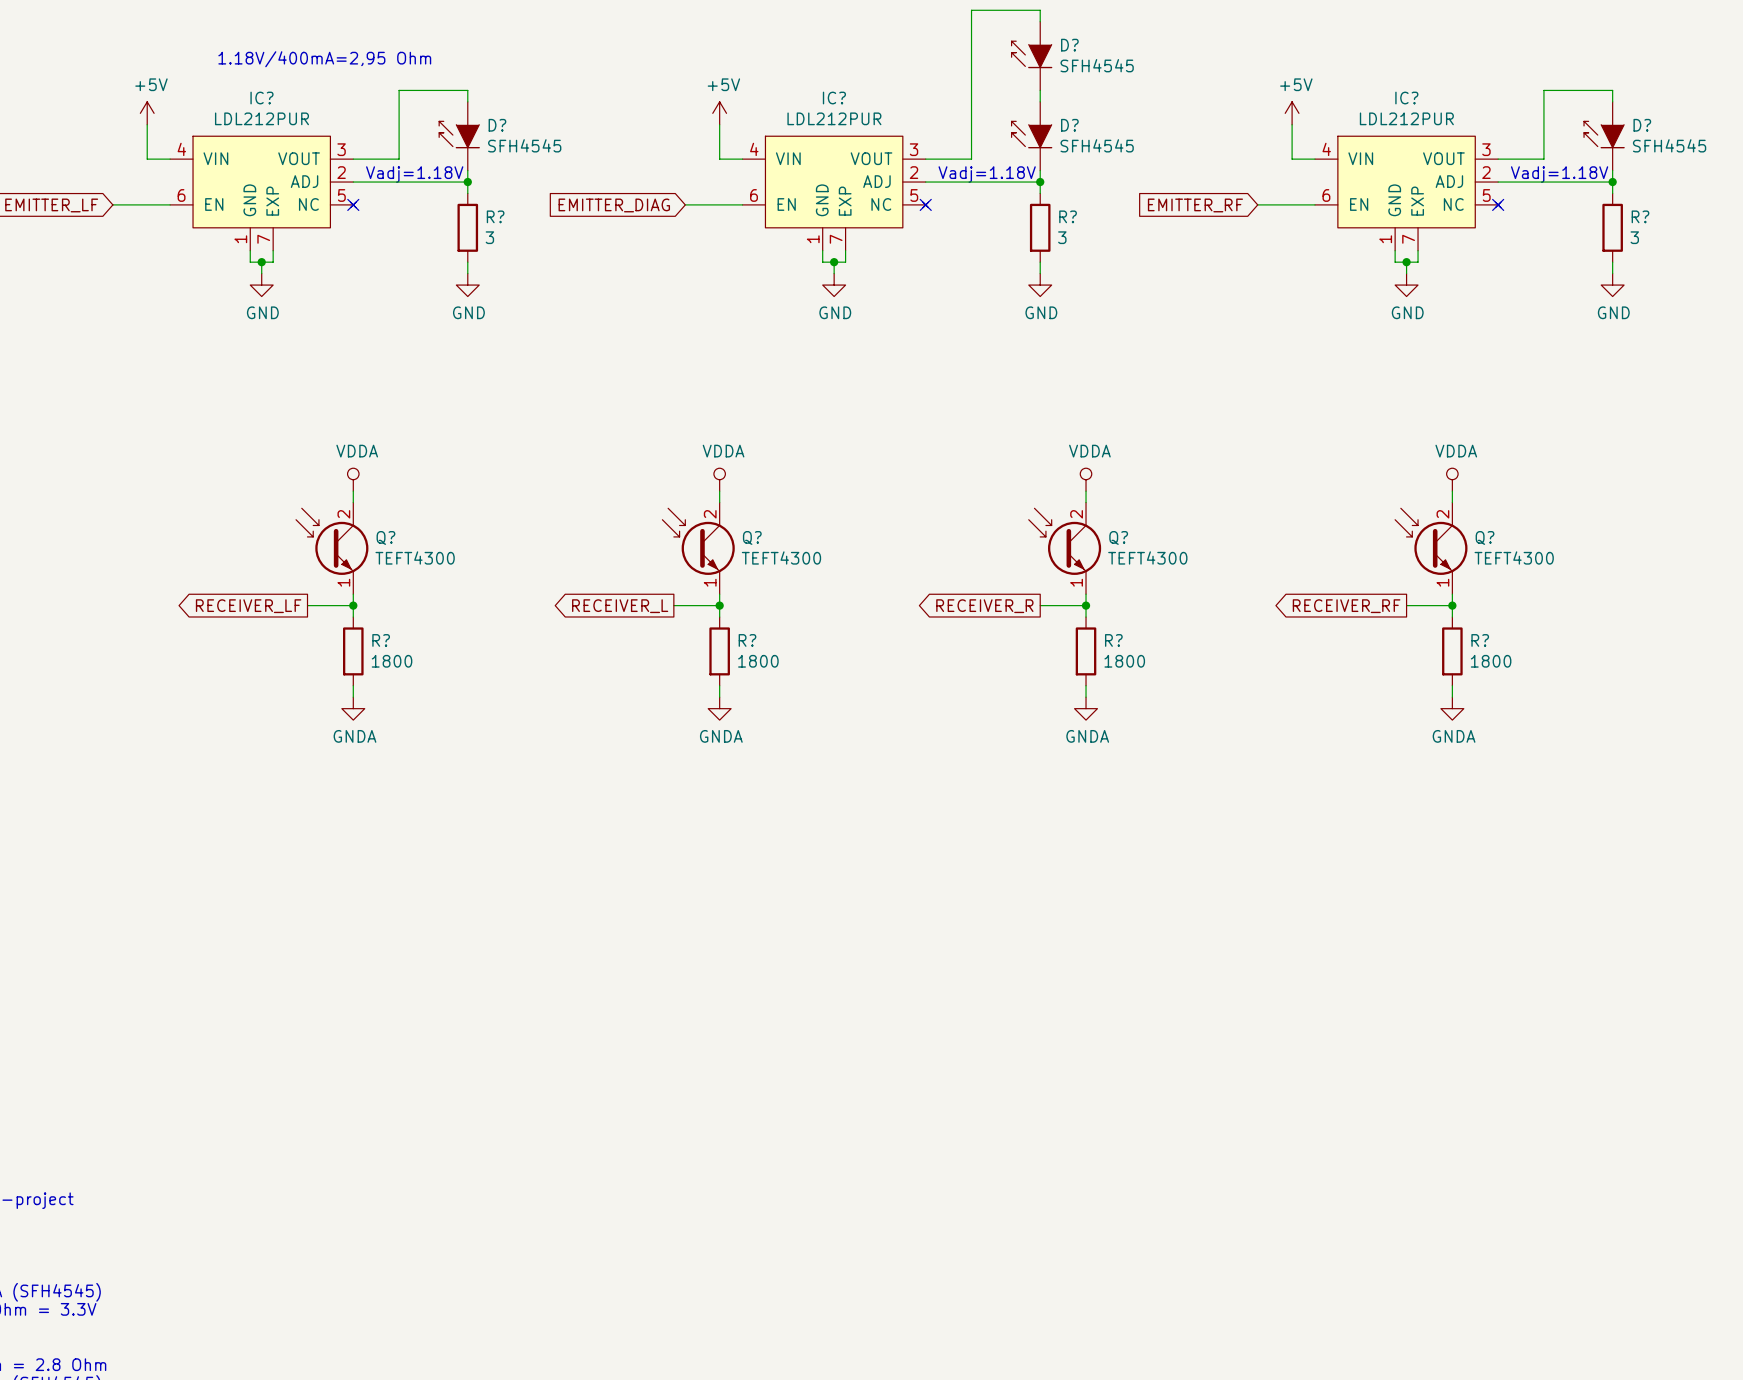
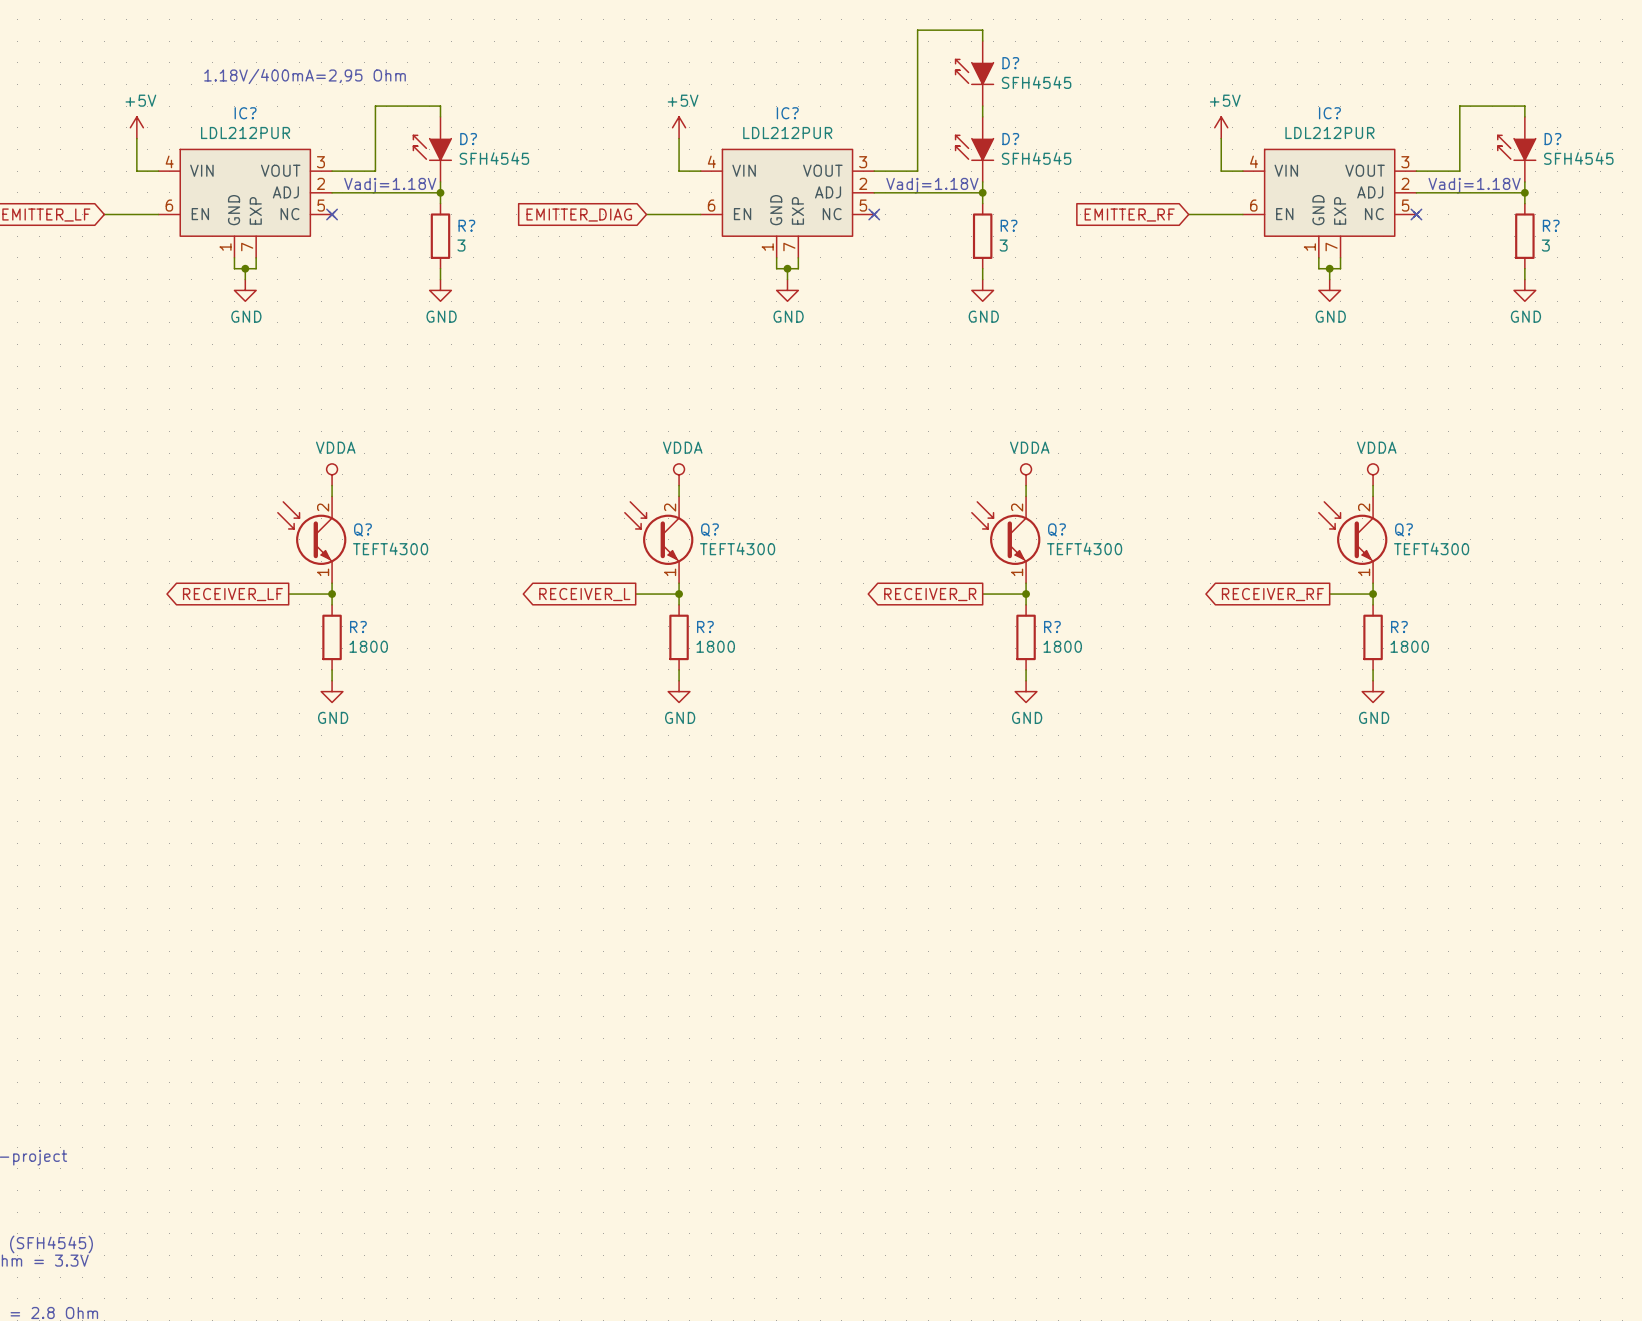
power symbol: GNDA (353, 708) -> GND (332, 691)
power symbol: GNDA (719, 708) -> GND (679, 691)
power symbol: GNDA (1086, 708) -> GND (1026, 691)
power symbol: GNDA (1452, 708) -> GND (1373, 691)

